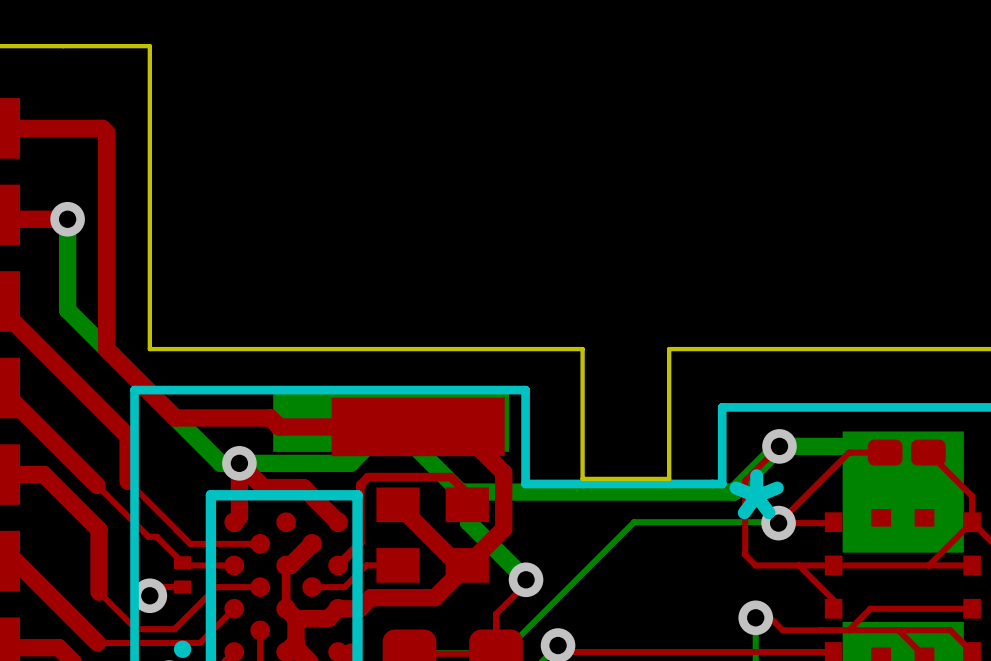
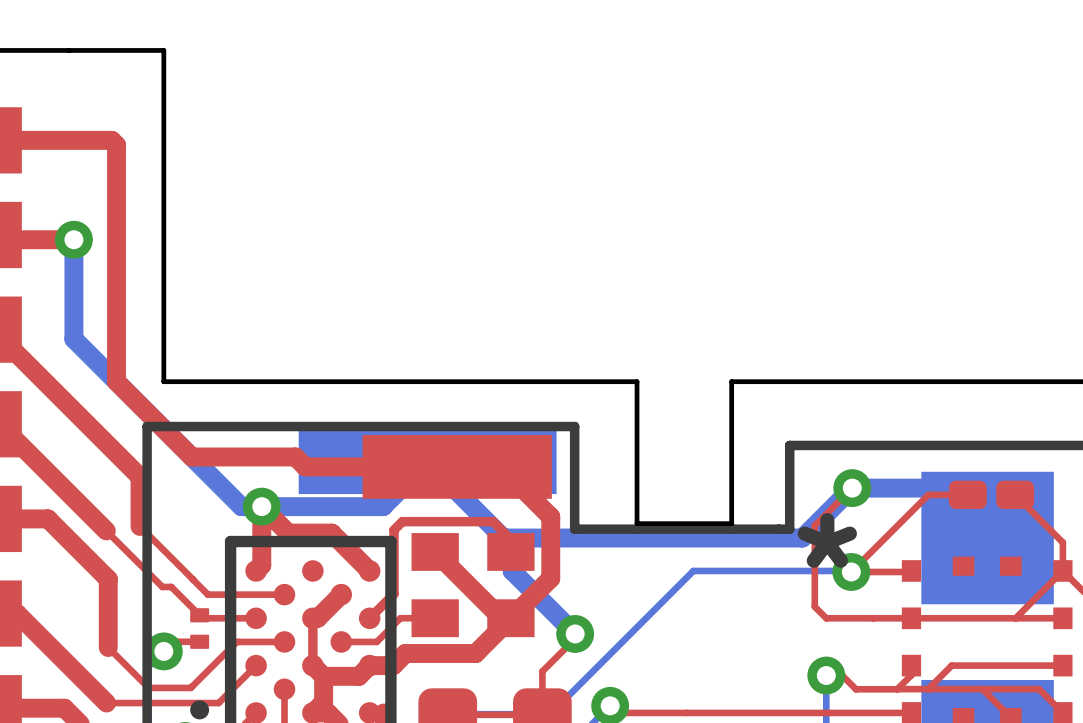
top track: (798, 565) (833, 600) (833, 608) -> (897, 689) (911, 675) (911, 665)

